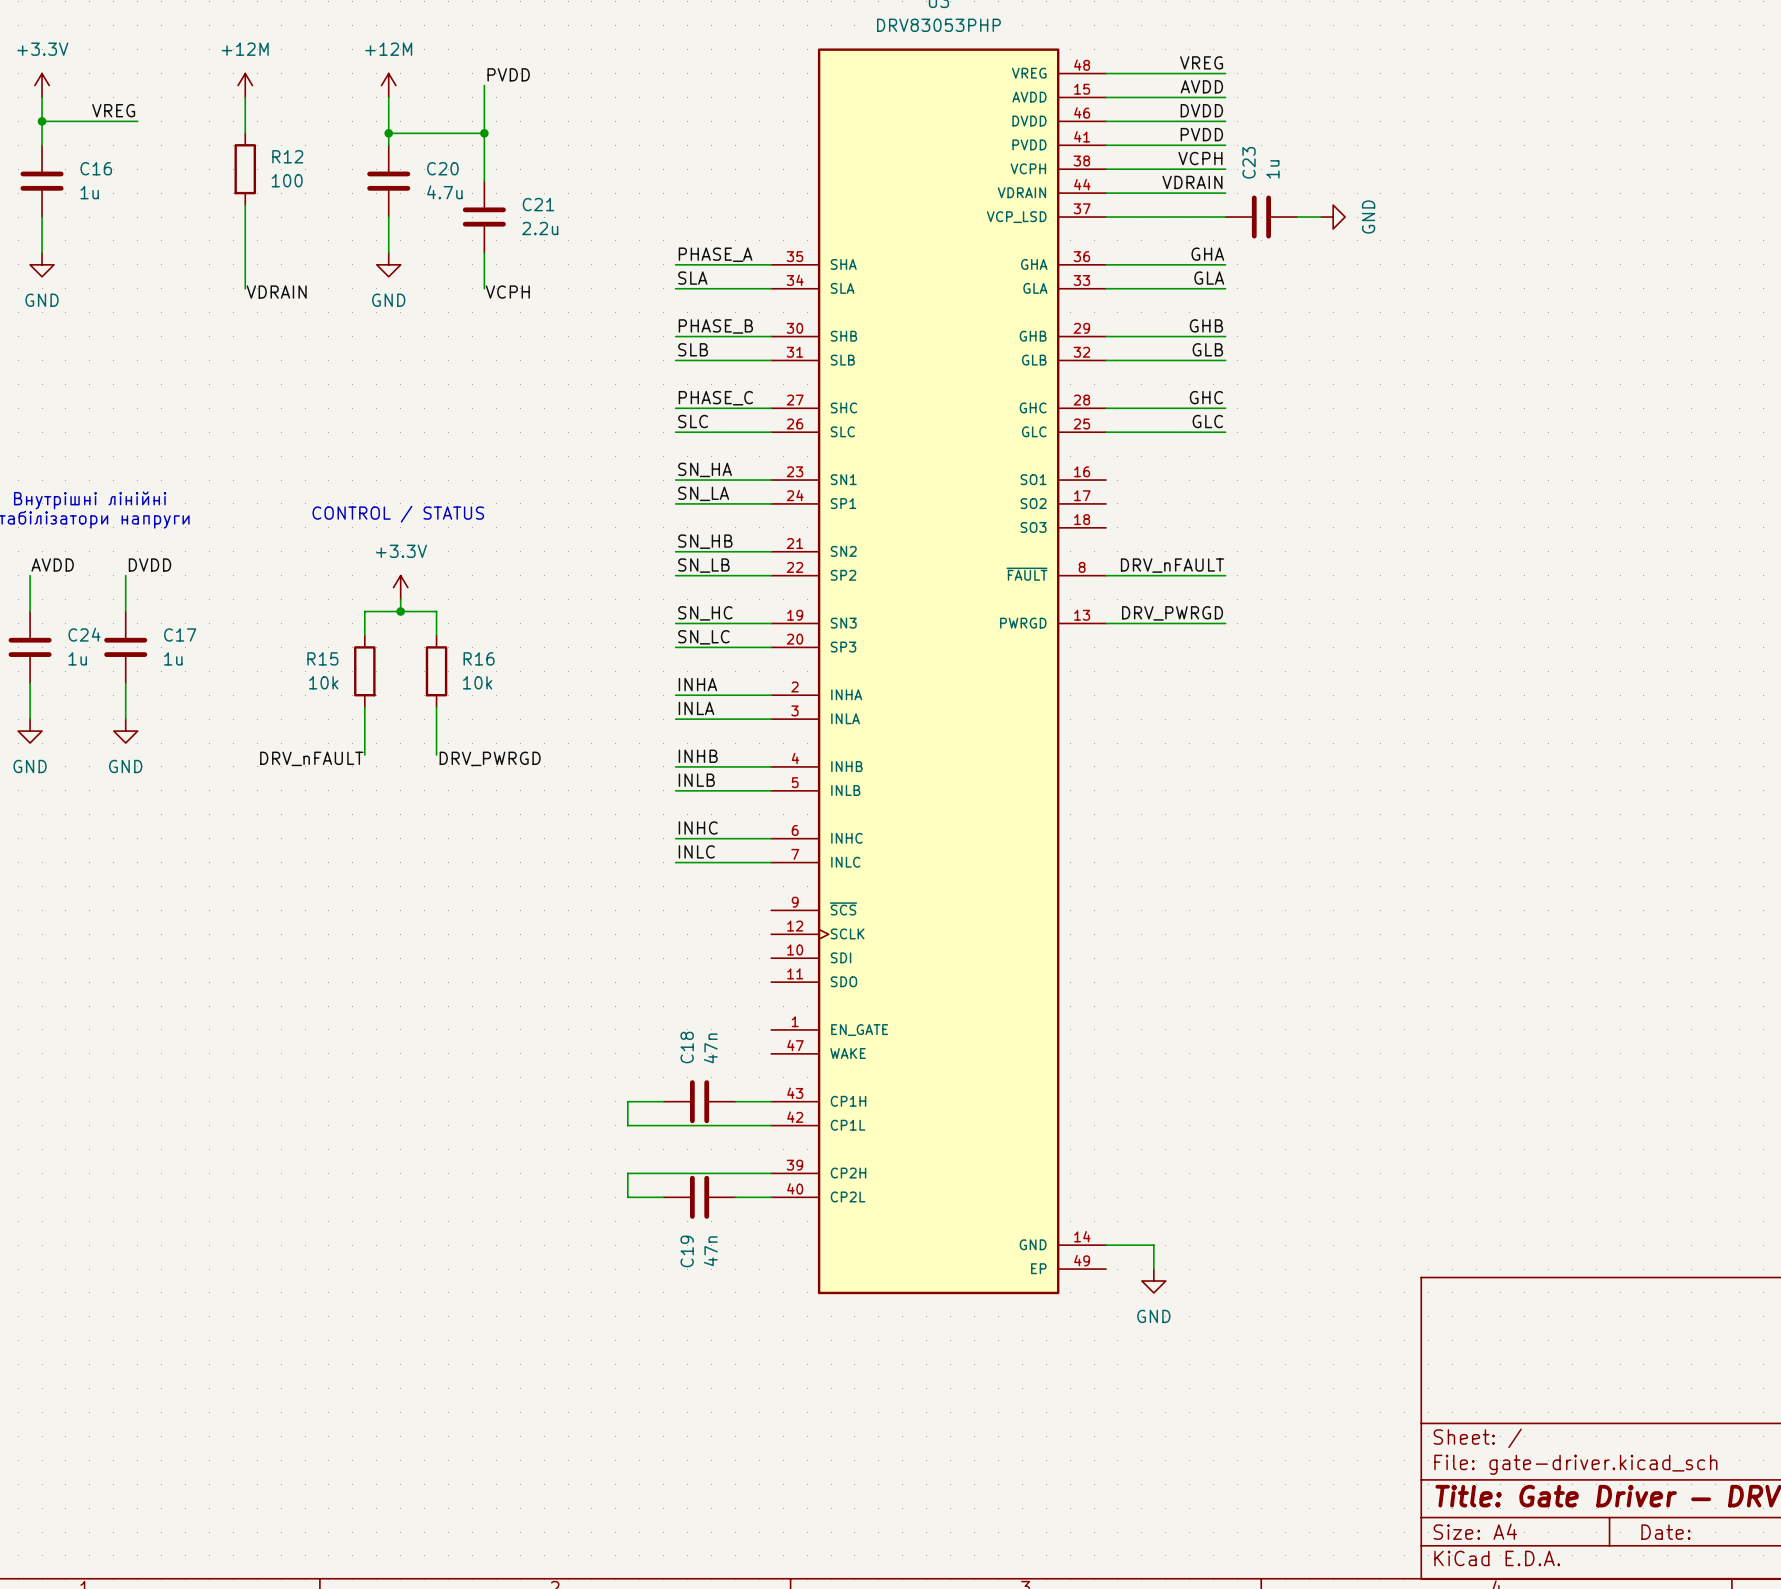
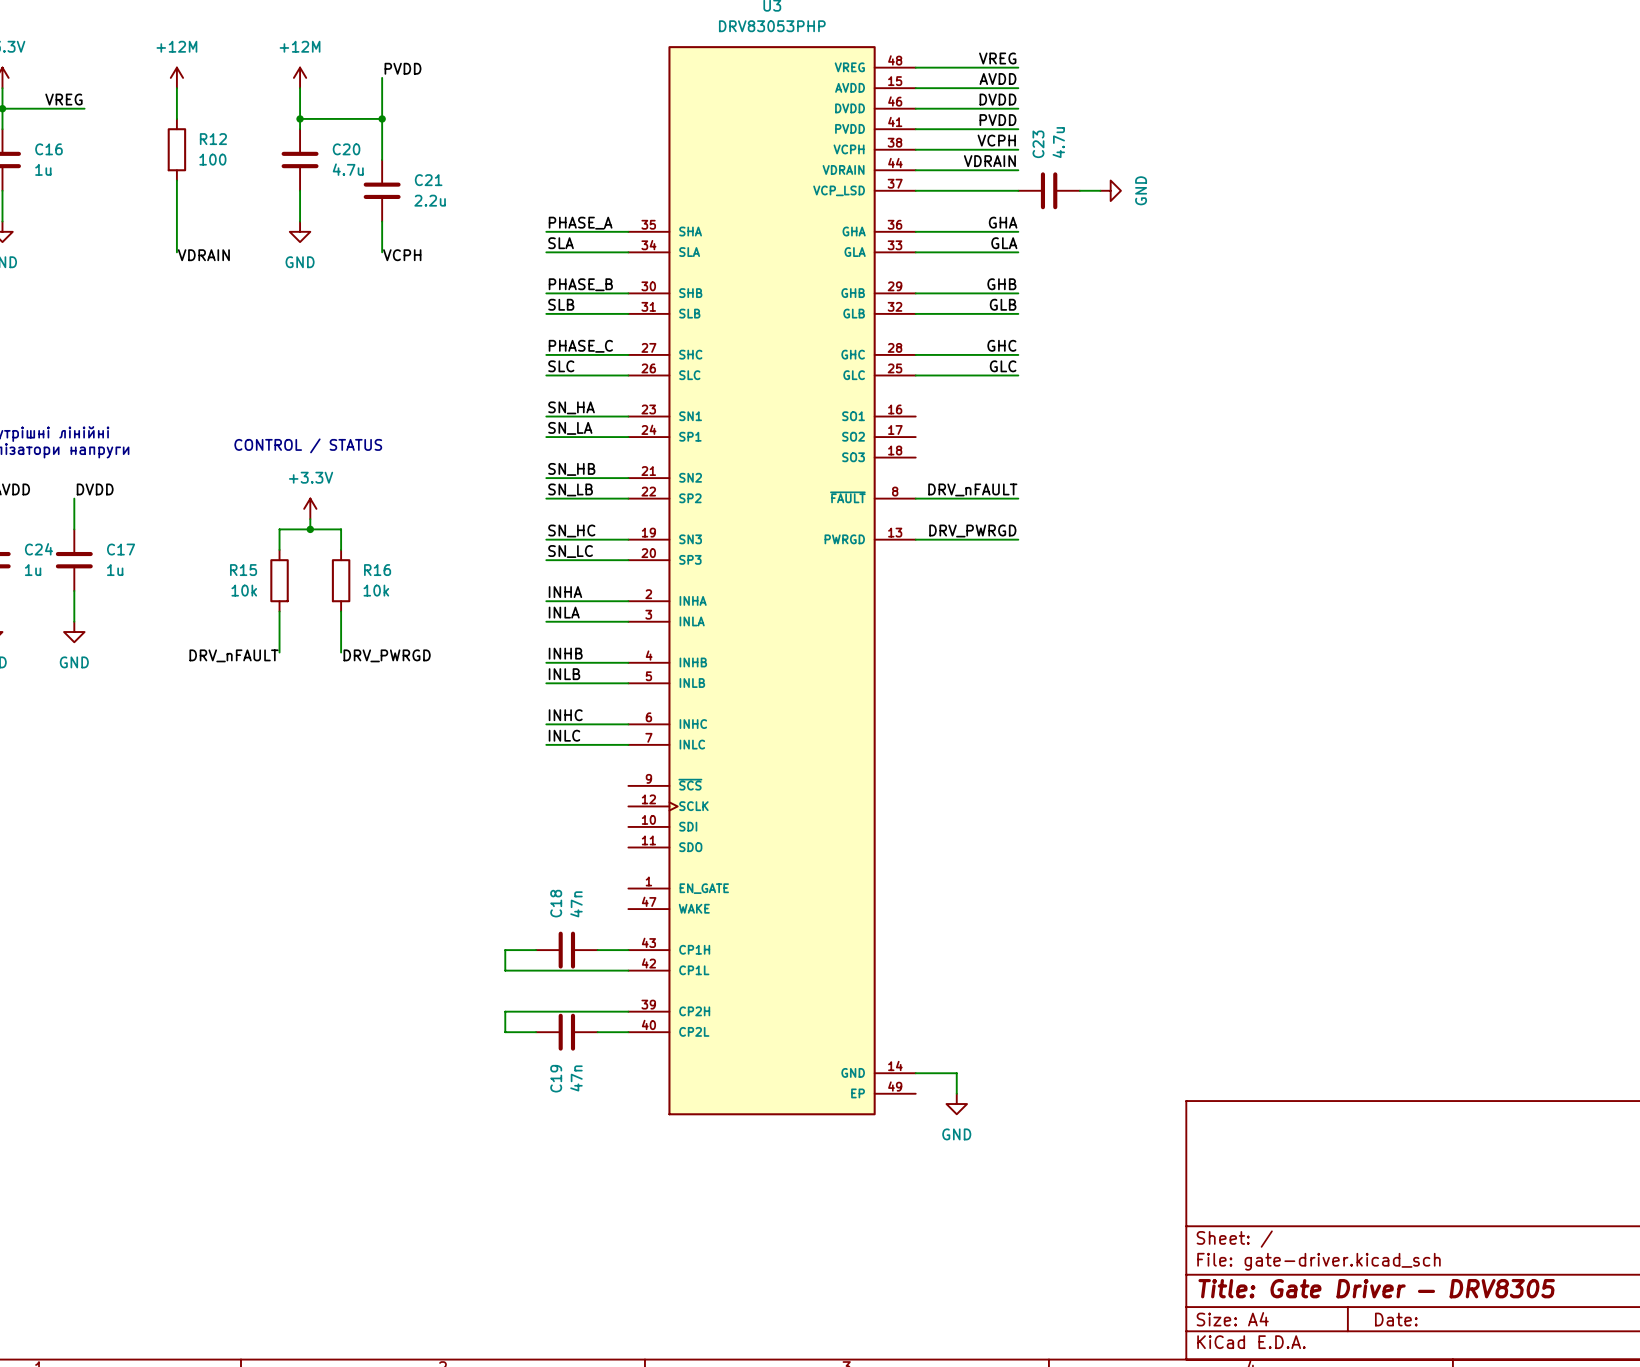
C23 value: 1u (1272, 169) -> 4.7u (1058, 142)

